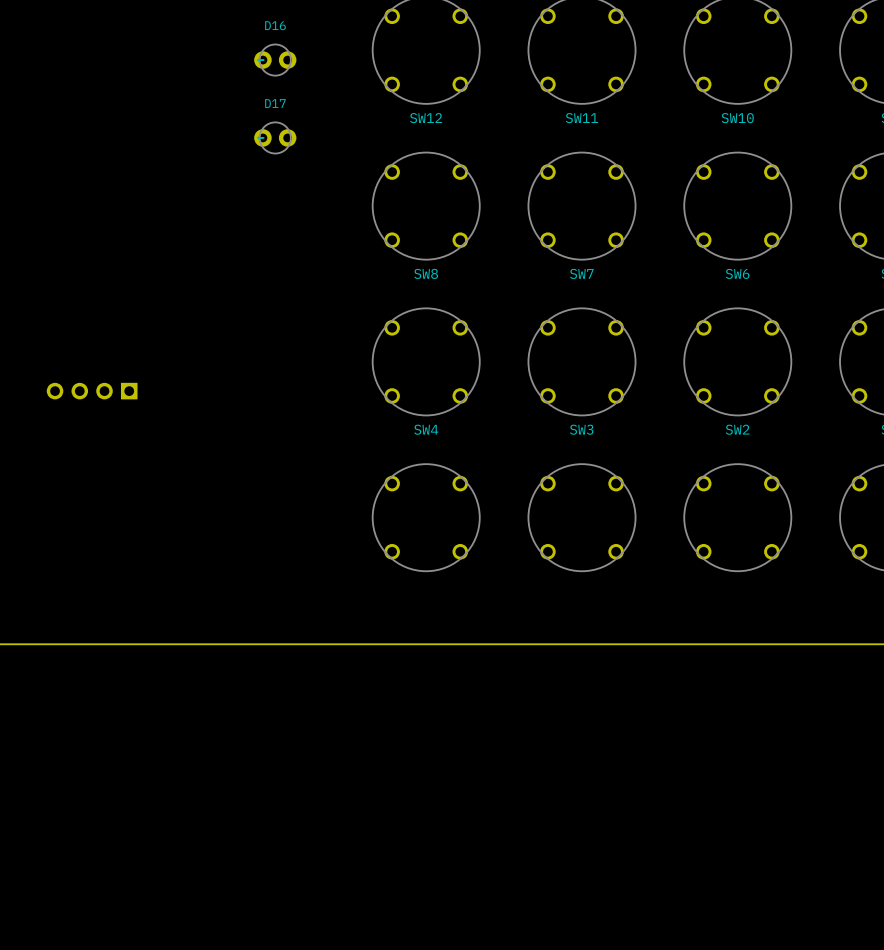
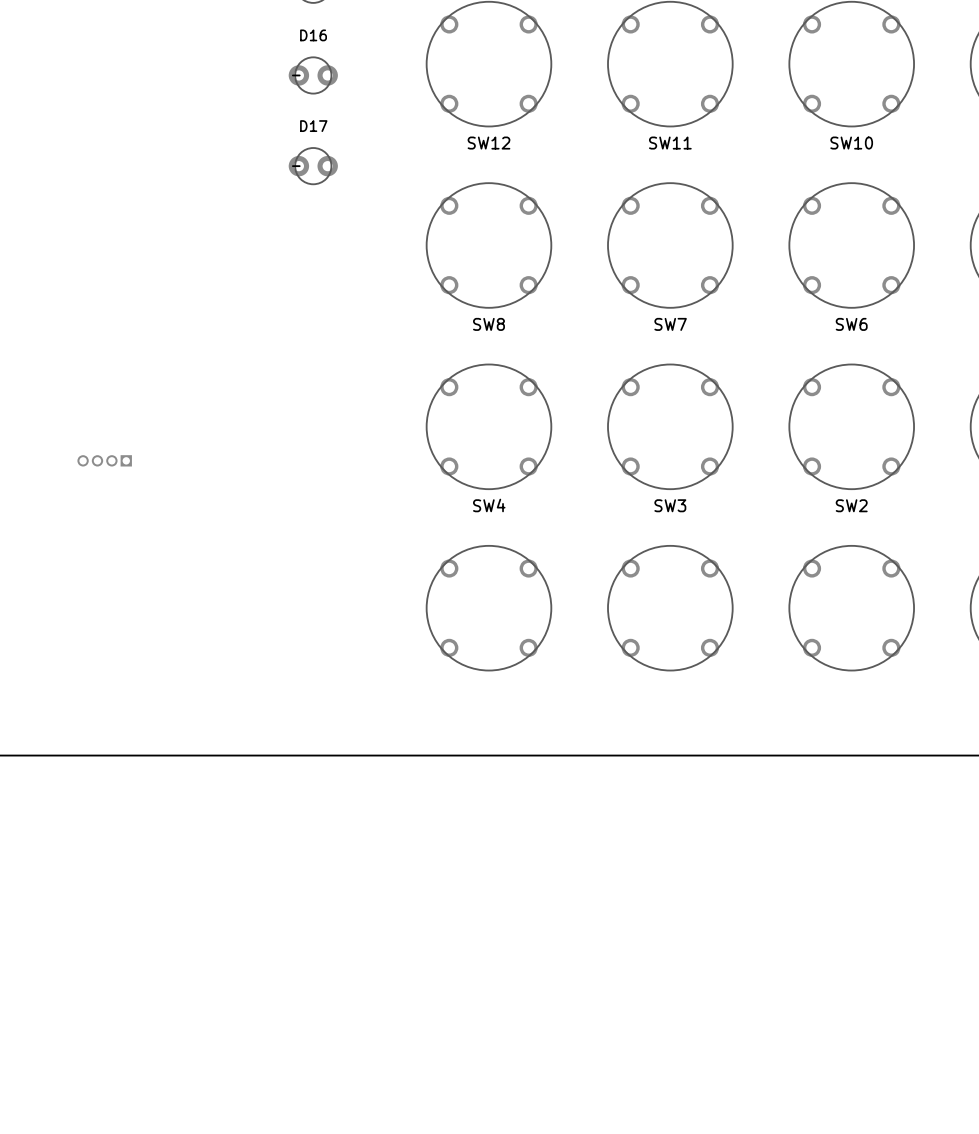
part footprint: [46, 382, 138, 400] -> [77, 455, 132, 467]

